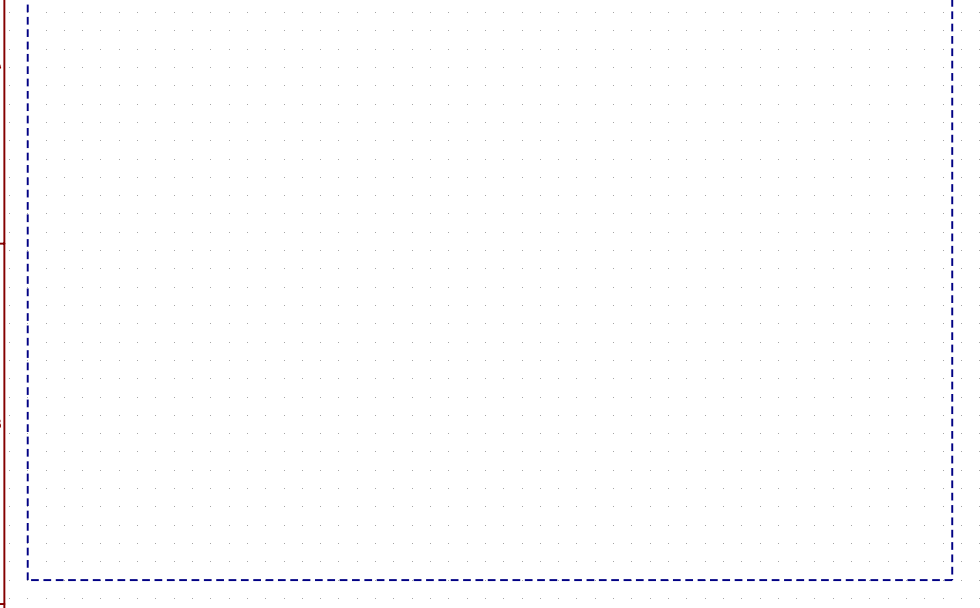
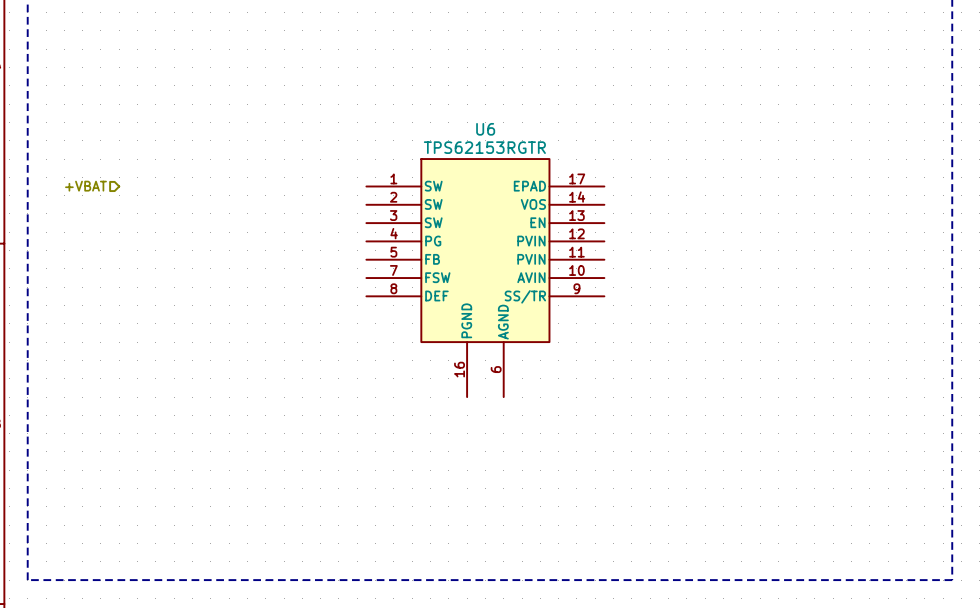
hierarchical label: none -> +VBAT (85, 186)
U6: none -> TPS62153RGTR (485, 278)

